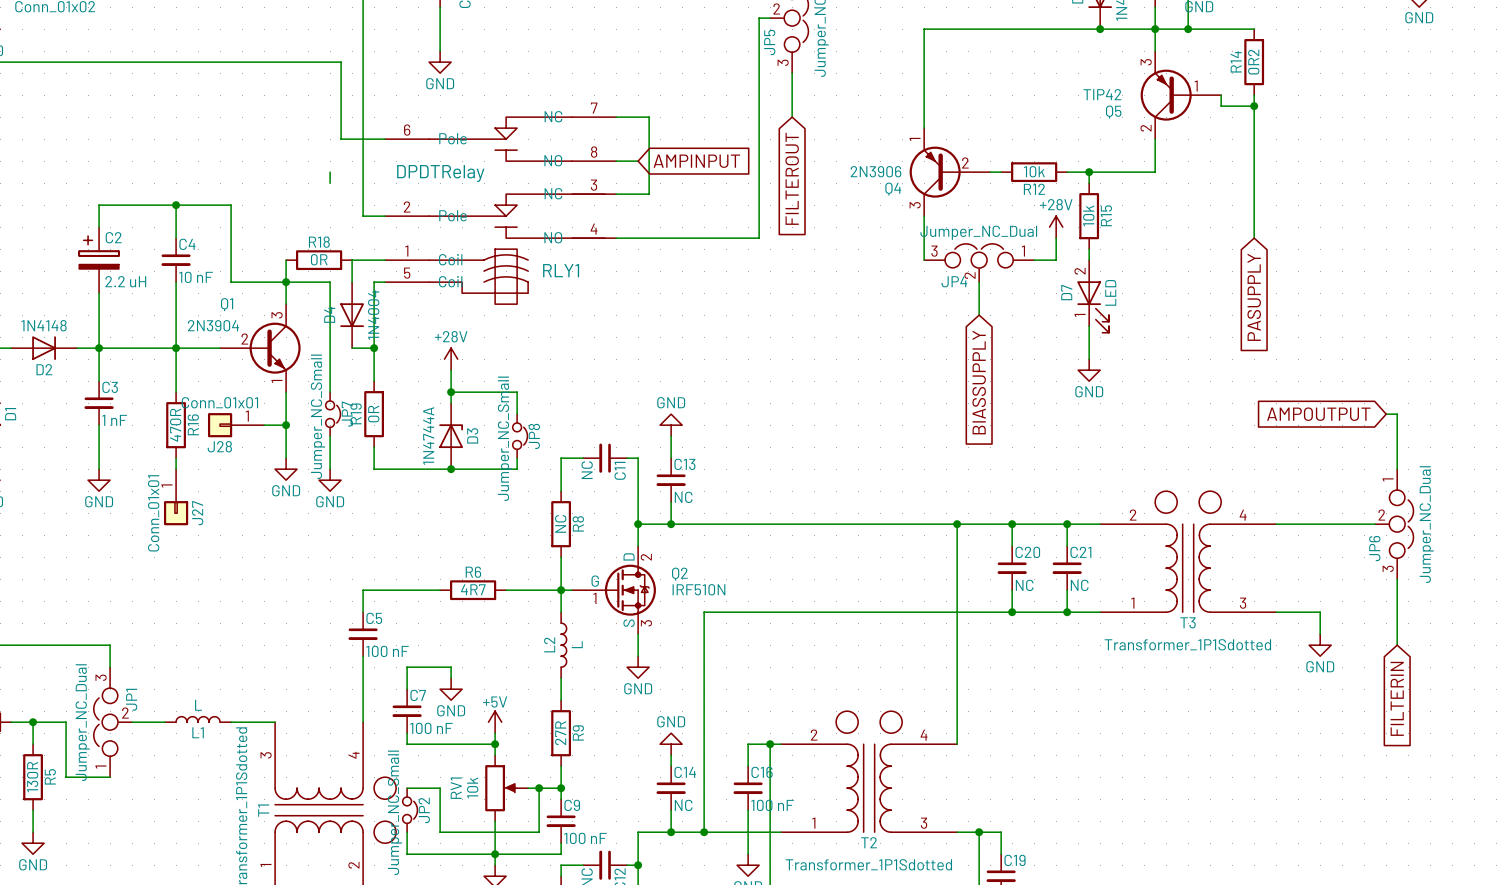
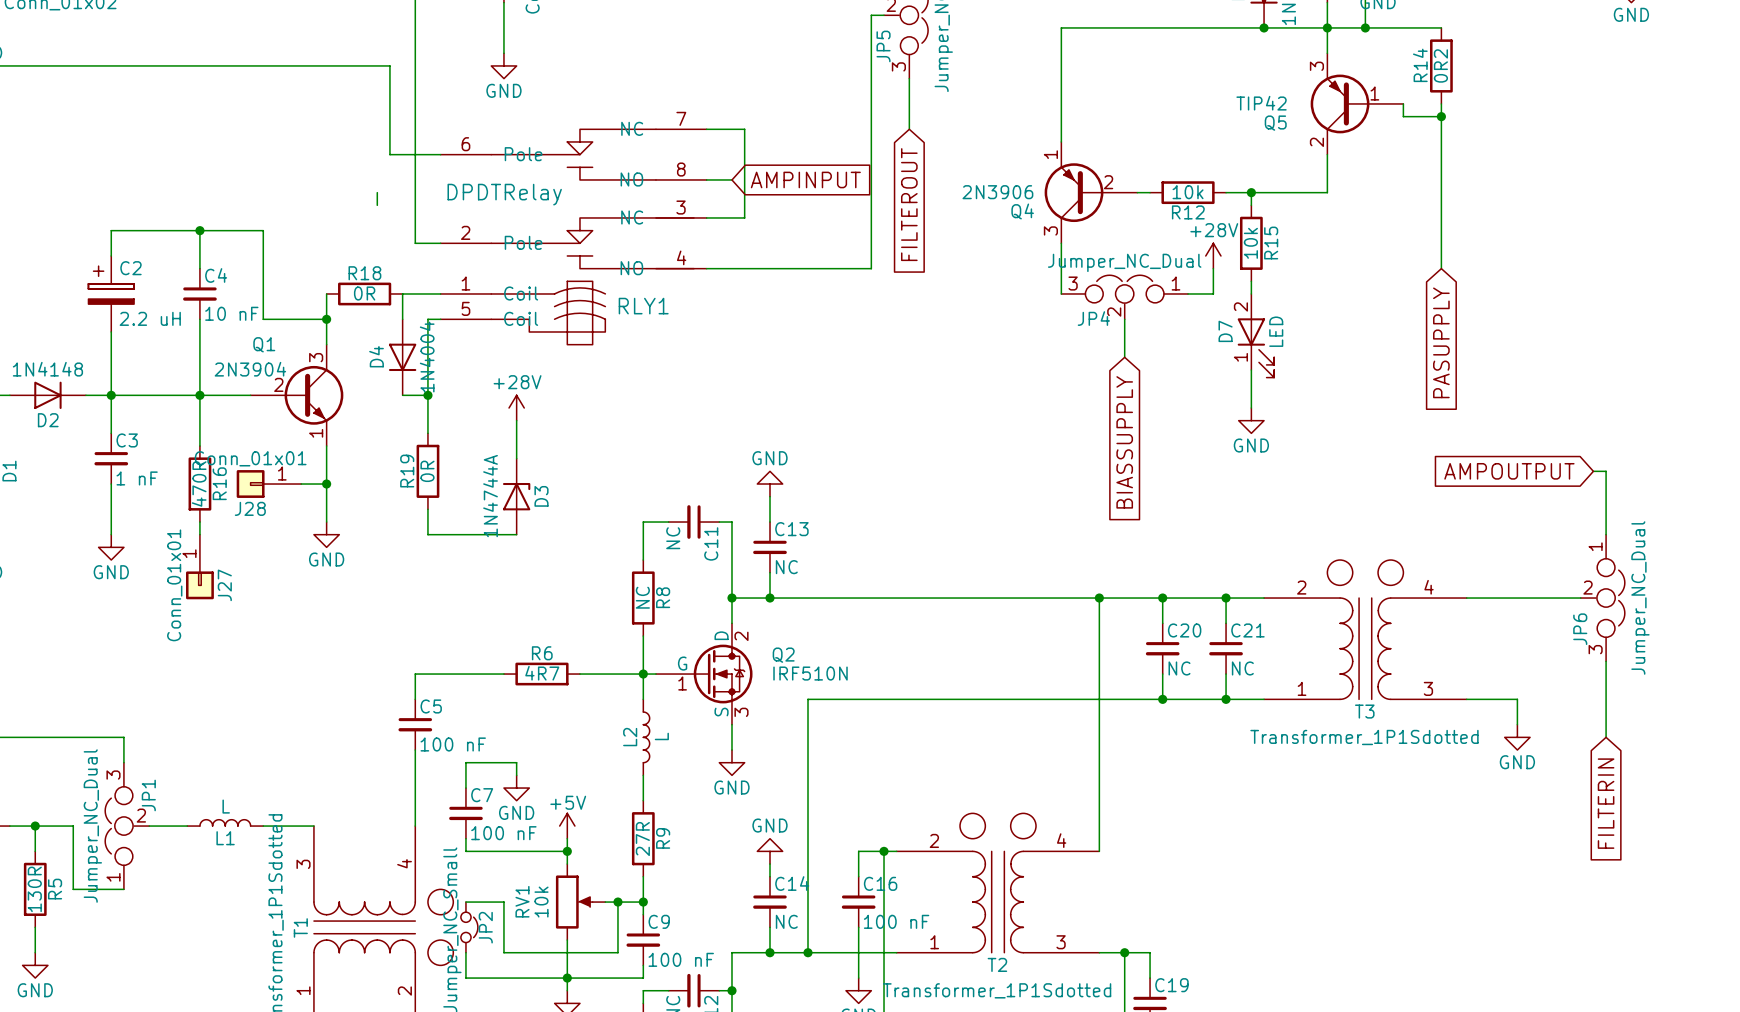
wire: (286, 282) (330, 282) (330, 392) -> none
wire: (451, 392) (517, 392) (517, 414) -> none
junction: (451, 392) -> none
JP7: Jumper_NC_Small (333, 414) -> none
wire: (330, 436) (330, 469) -> none
JP8: Jumper_NC_Small (520, 436) -> none
wire: (517, 458) (517, 469) (451, 469) -> none
junction: (451, 469) -> none
power symbol: GND (330, 480) -> none

